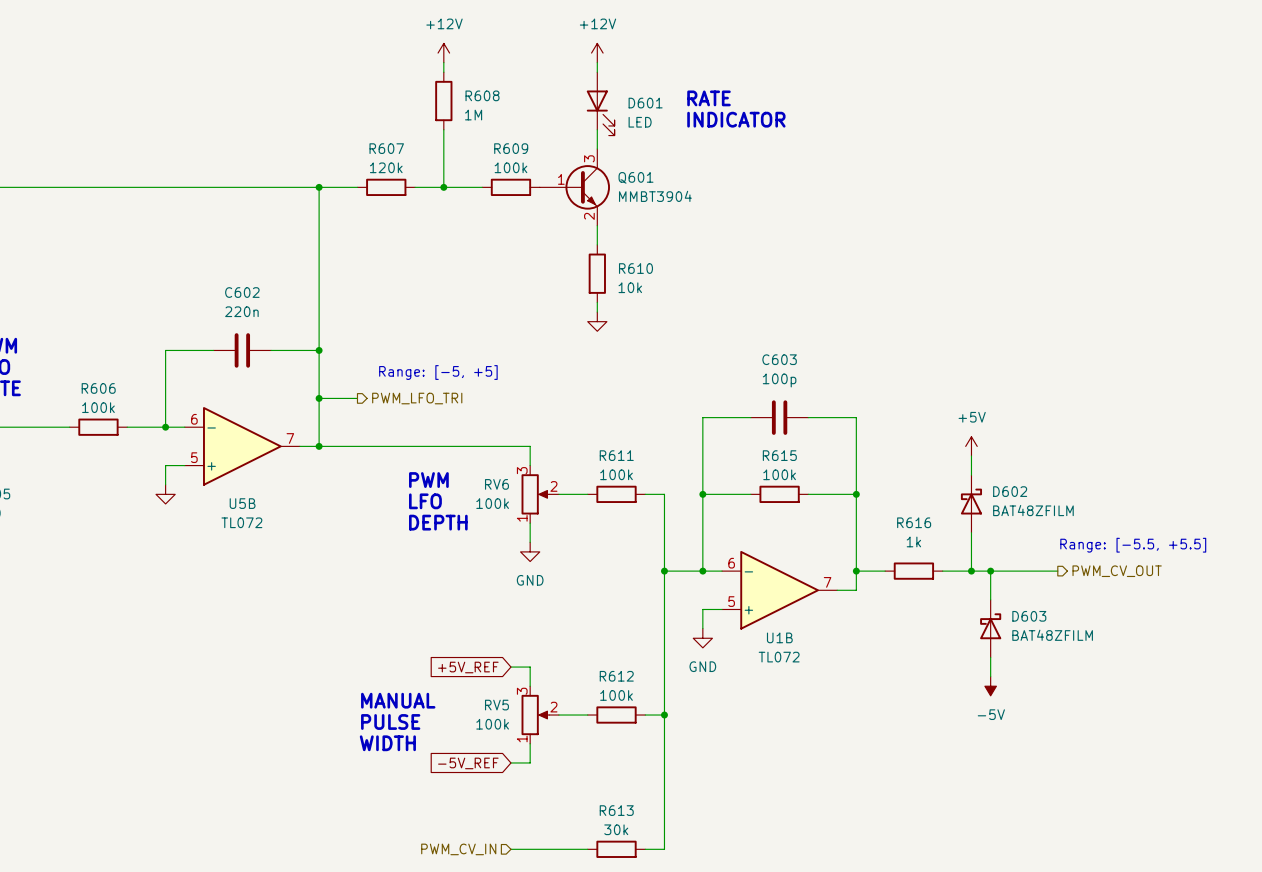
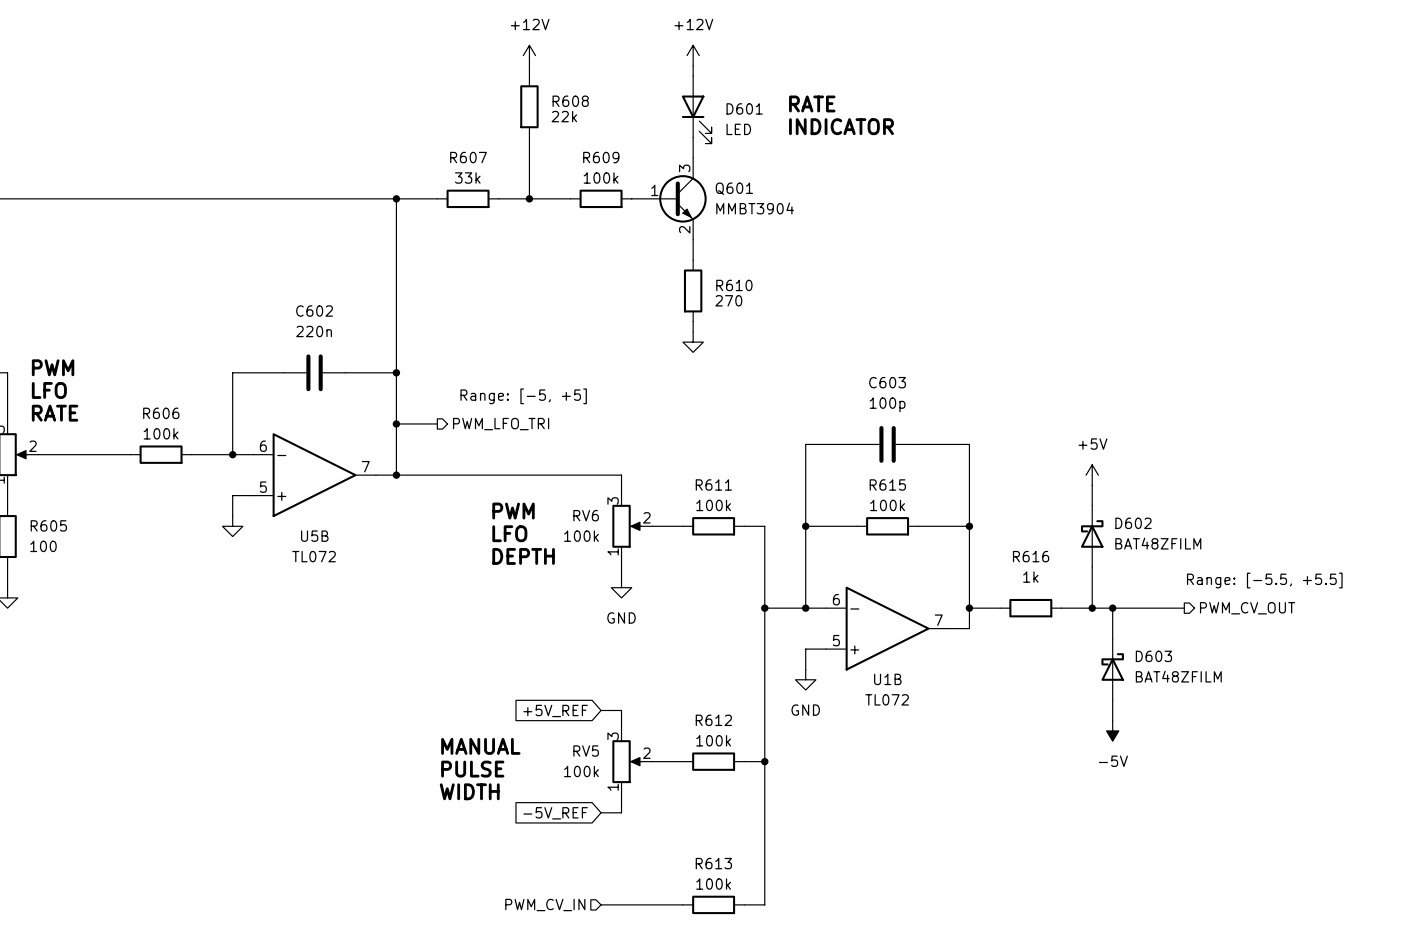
R608 value: 1M (473, 115) -> 22k (564, 116)
R607 value: 120k (386, 167) -> 33k (467, 178)
R610 value: 10k (630, 287) -> 270 (728, 300)
R613 value: 30k (616, 829) -> 100k (713, 884)

